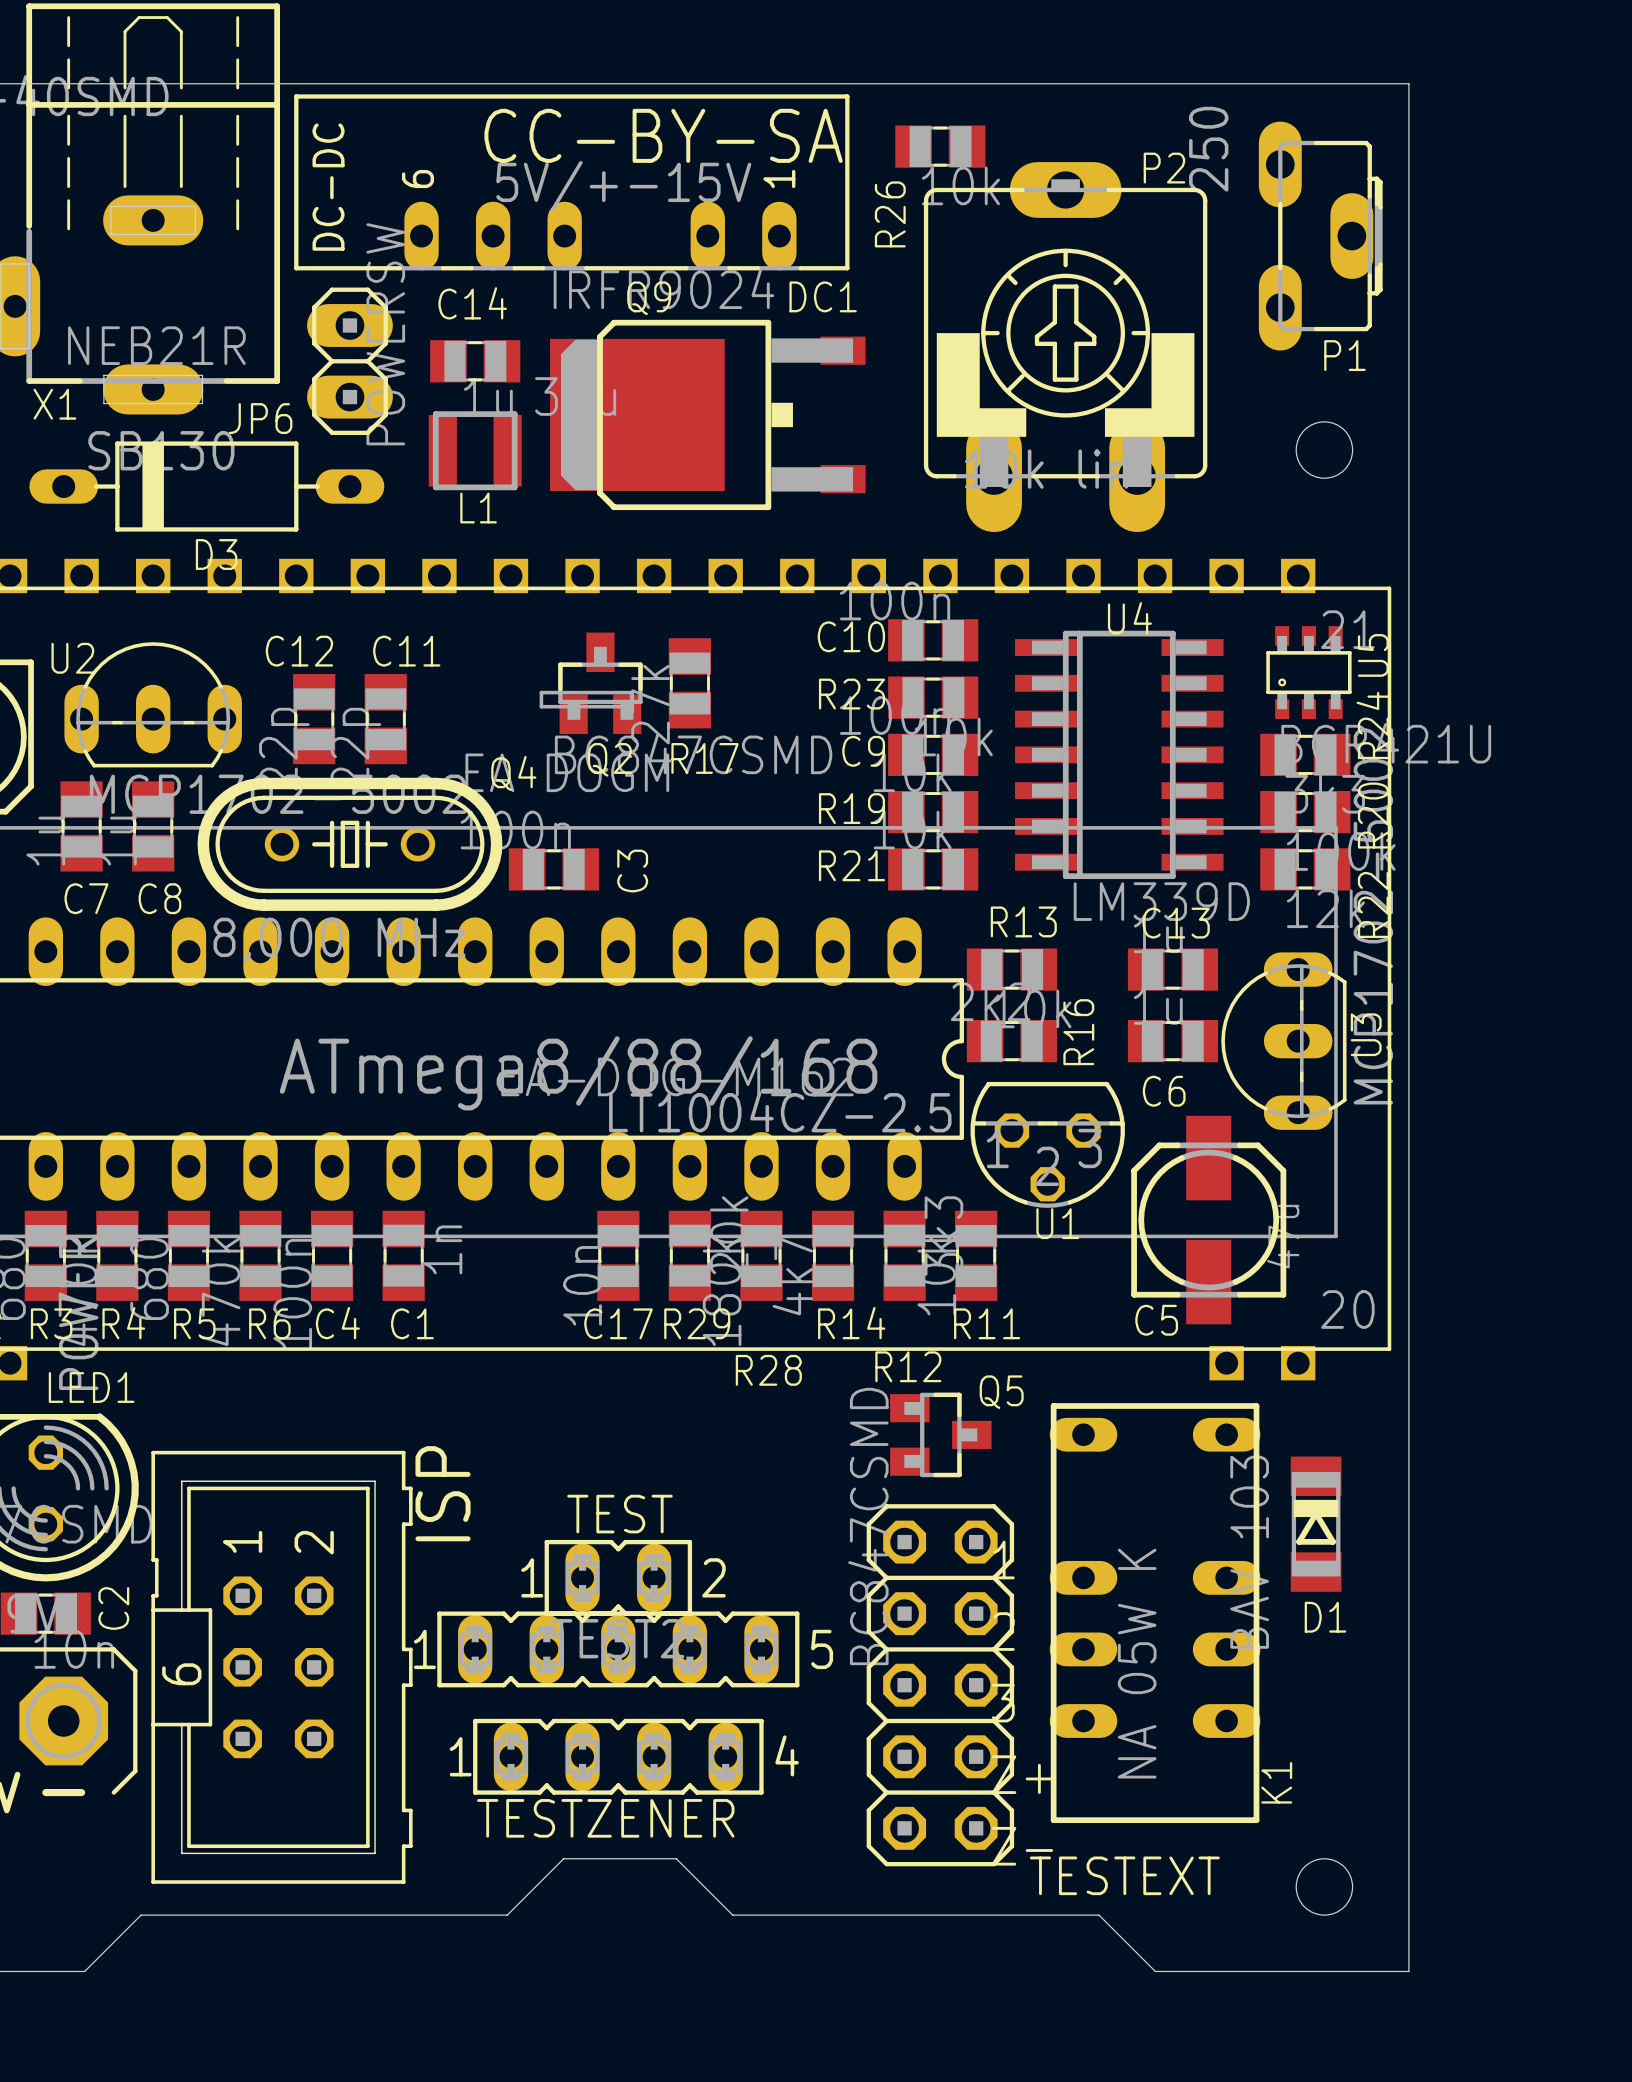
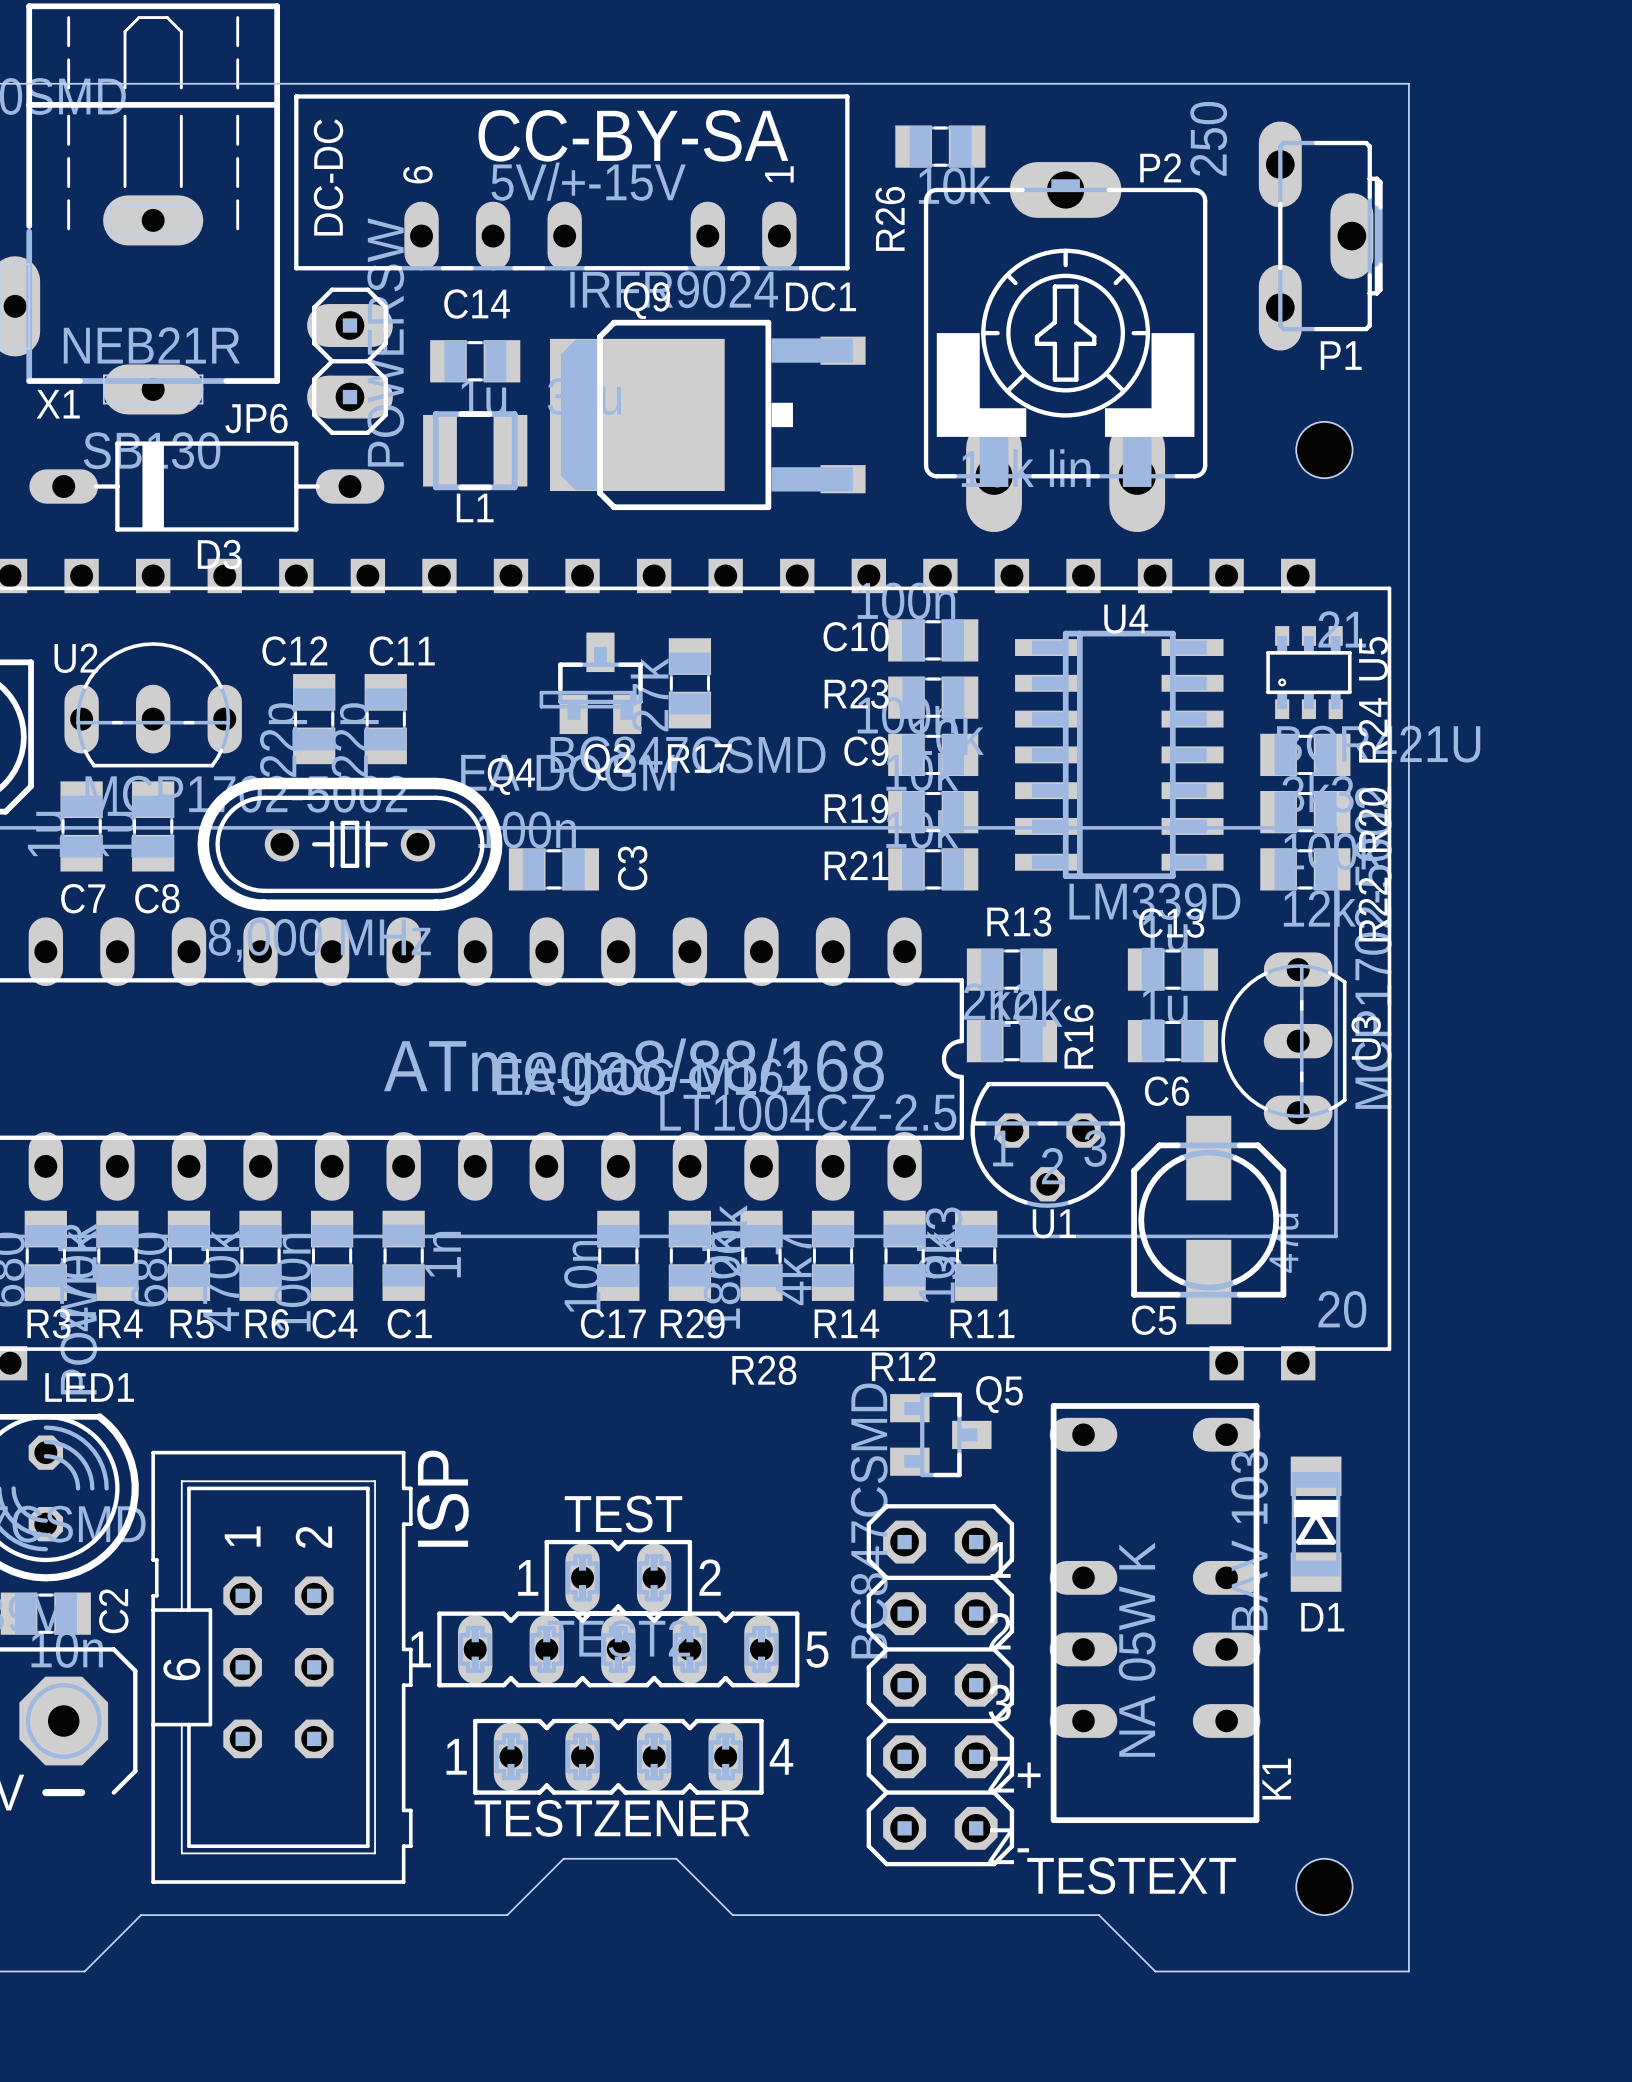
L1 footprint: [428, 411, 522, 491] -> [423, 411, 528, 491]

